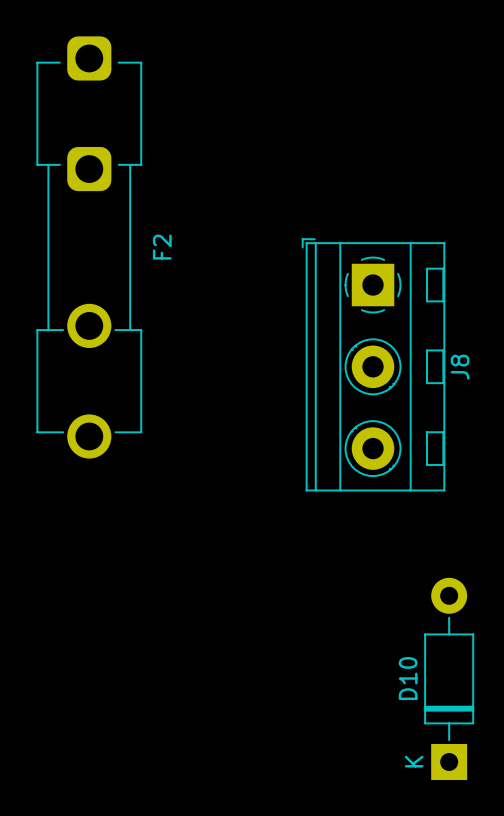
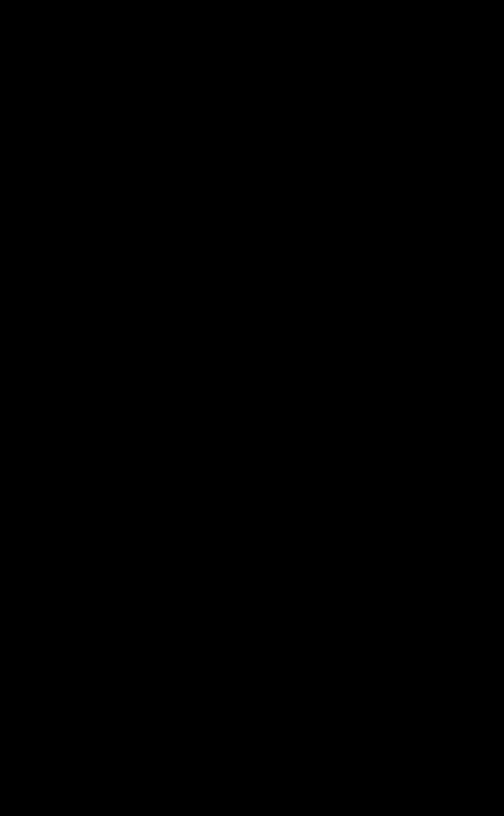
F2: (89, 247) -> none
J8: (373, 364) -> none
D10: (449, 678) -> none

